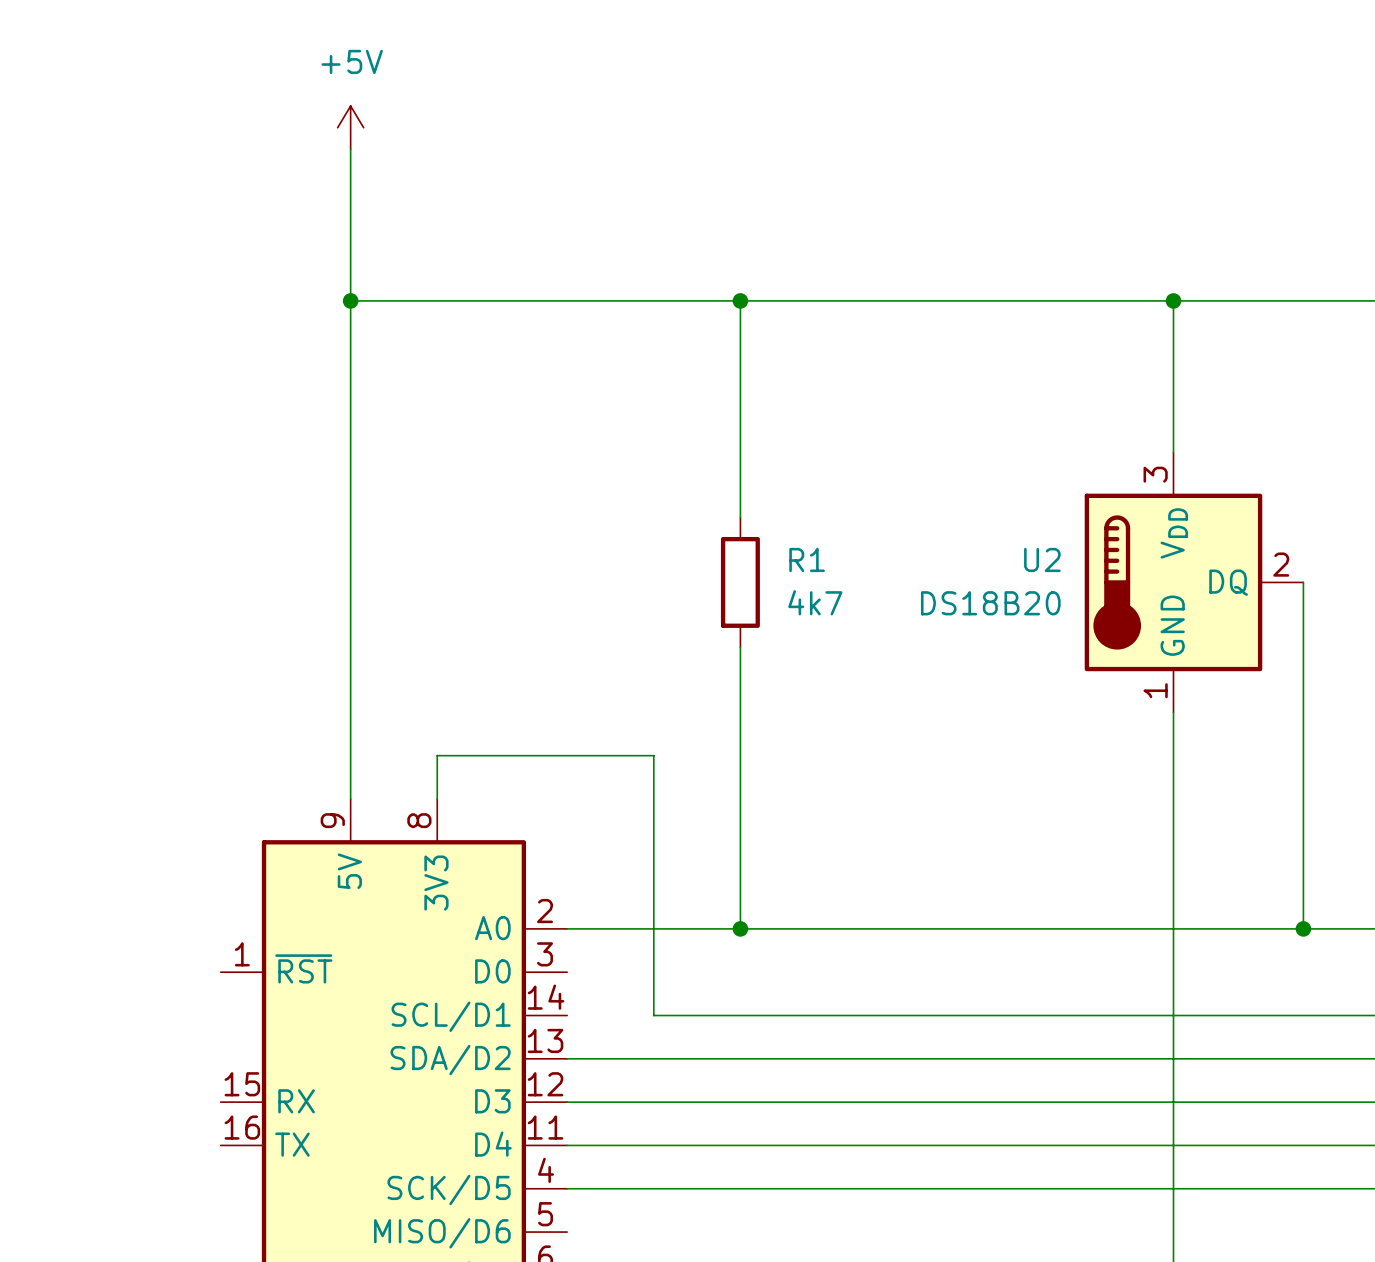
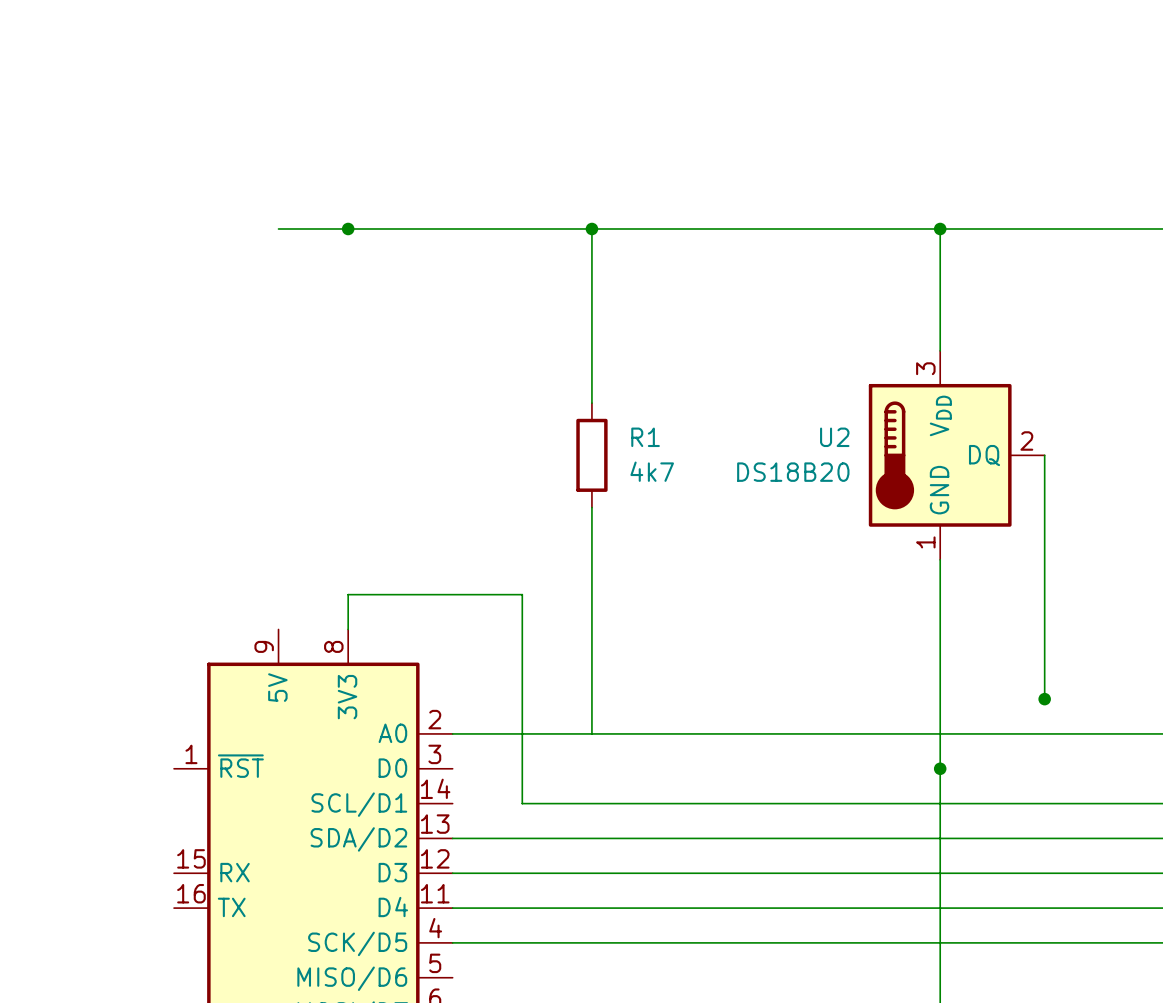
power symbol: +5V (350, 127) -> none
wire: (350, 149) (350, 798) -> none
junction position: (350, 300) -> (348, 228)
wire: (1303, 885) (1303, 928) -> none
junction: (740, 928) -> none
junction position: (1303, 928) -> (1044, 699)
junction: none -> (940, 768)

